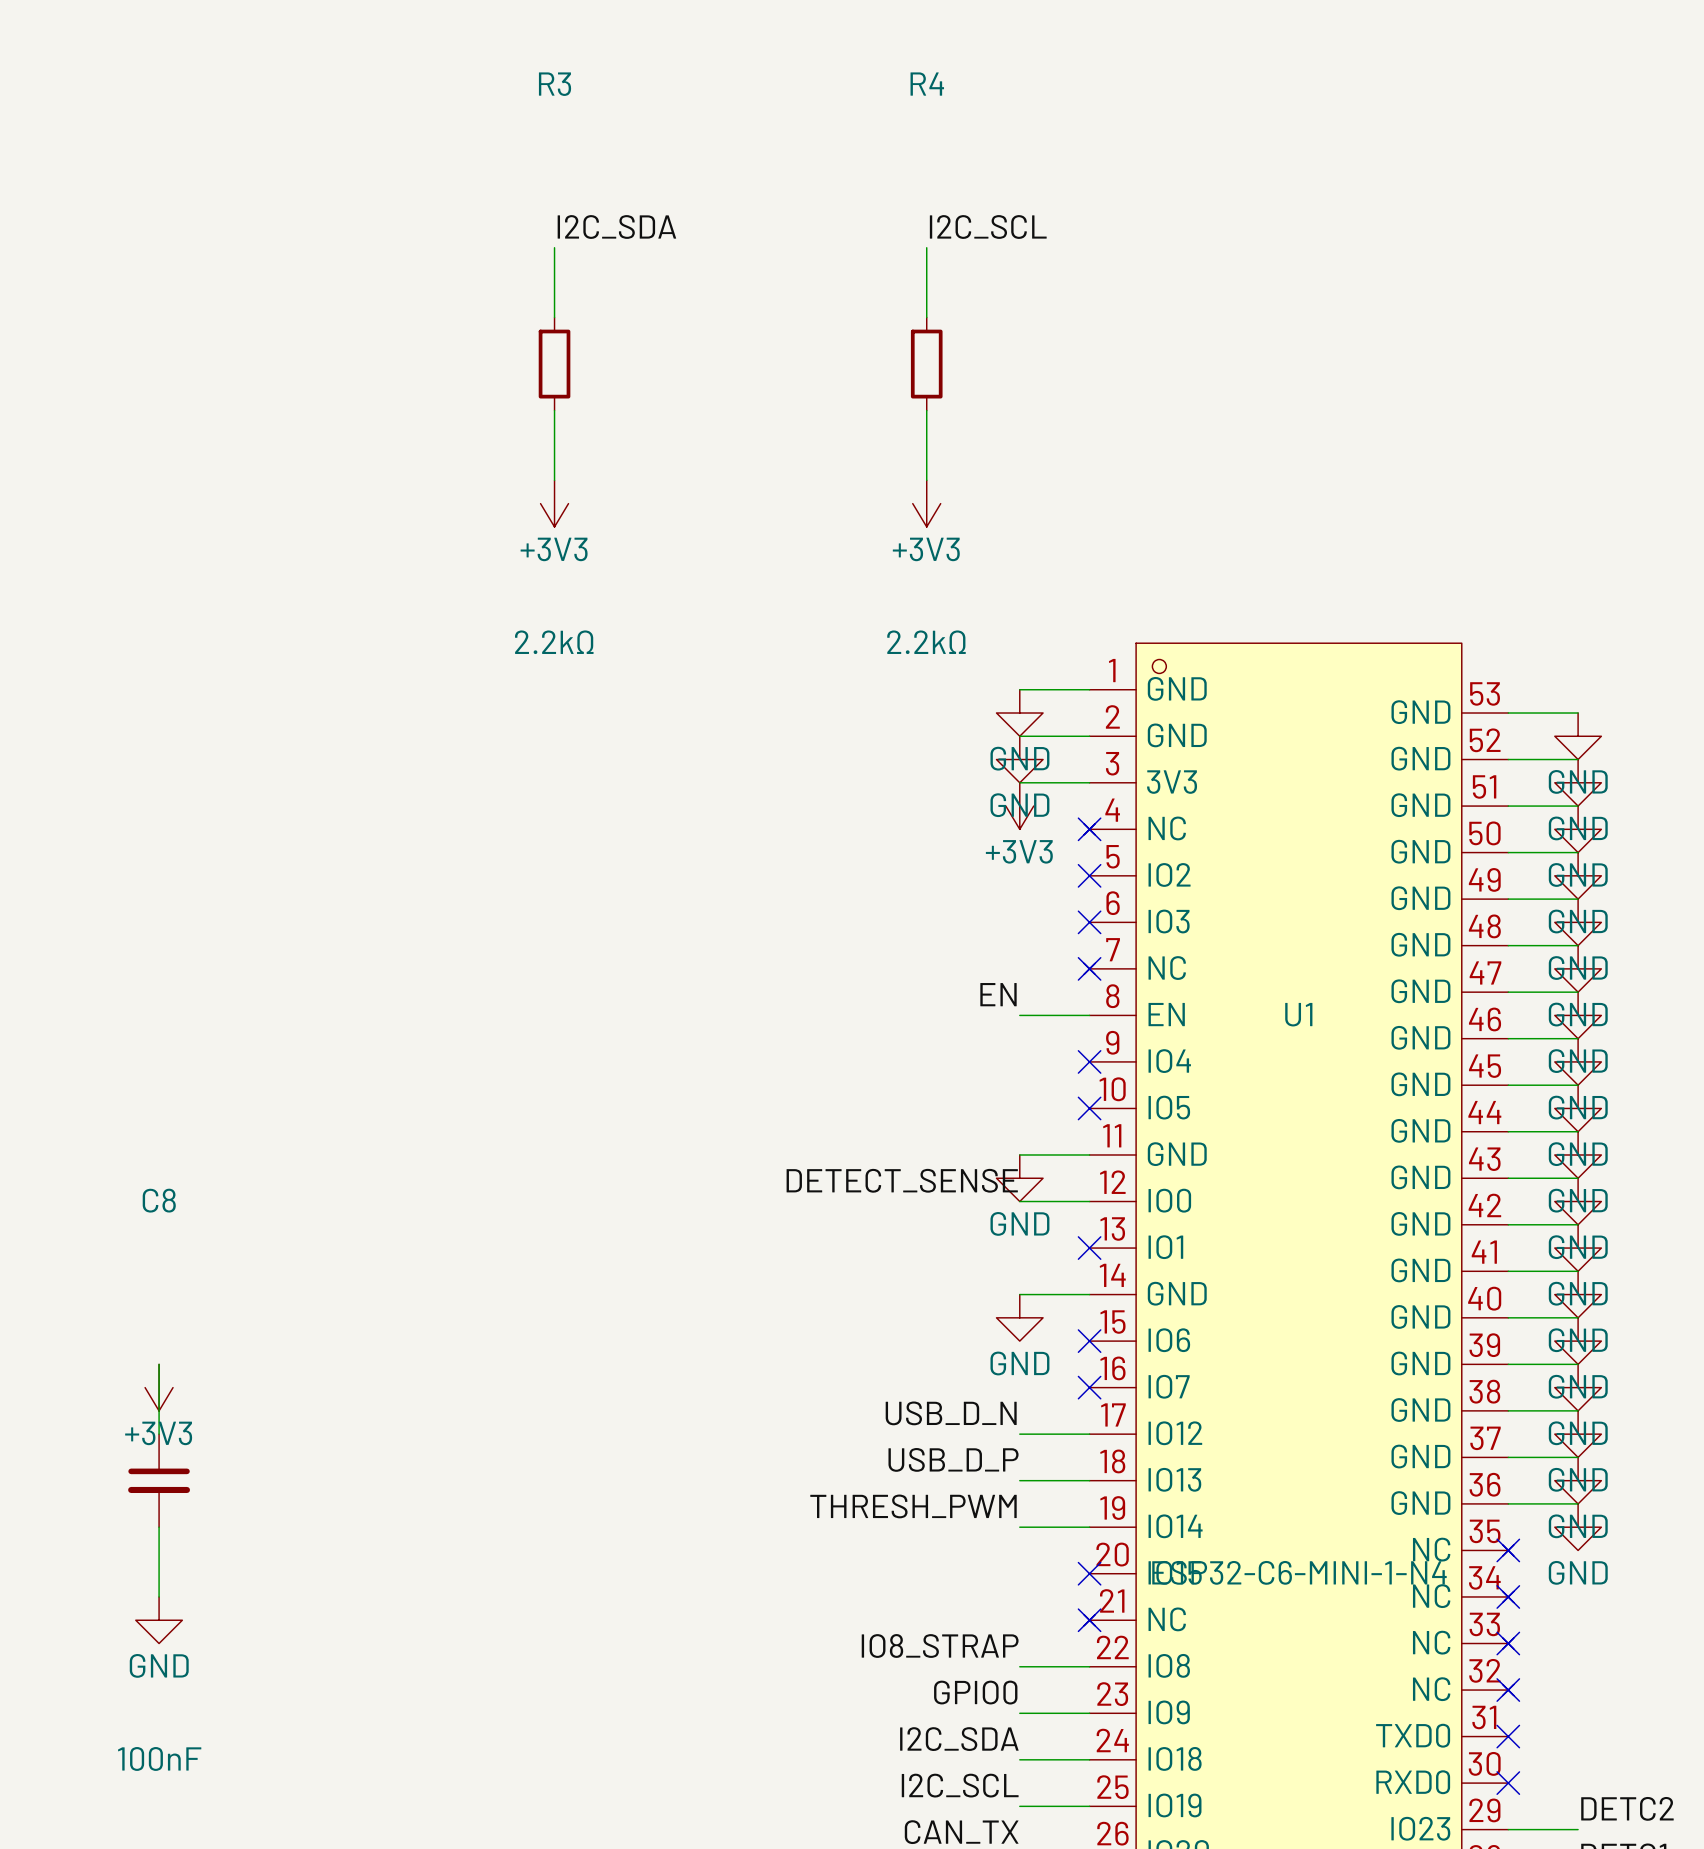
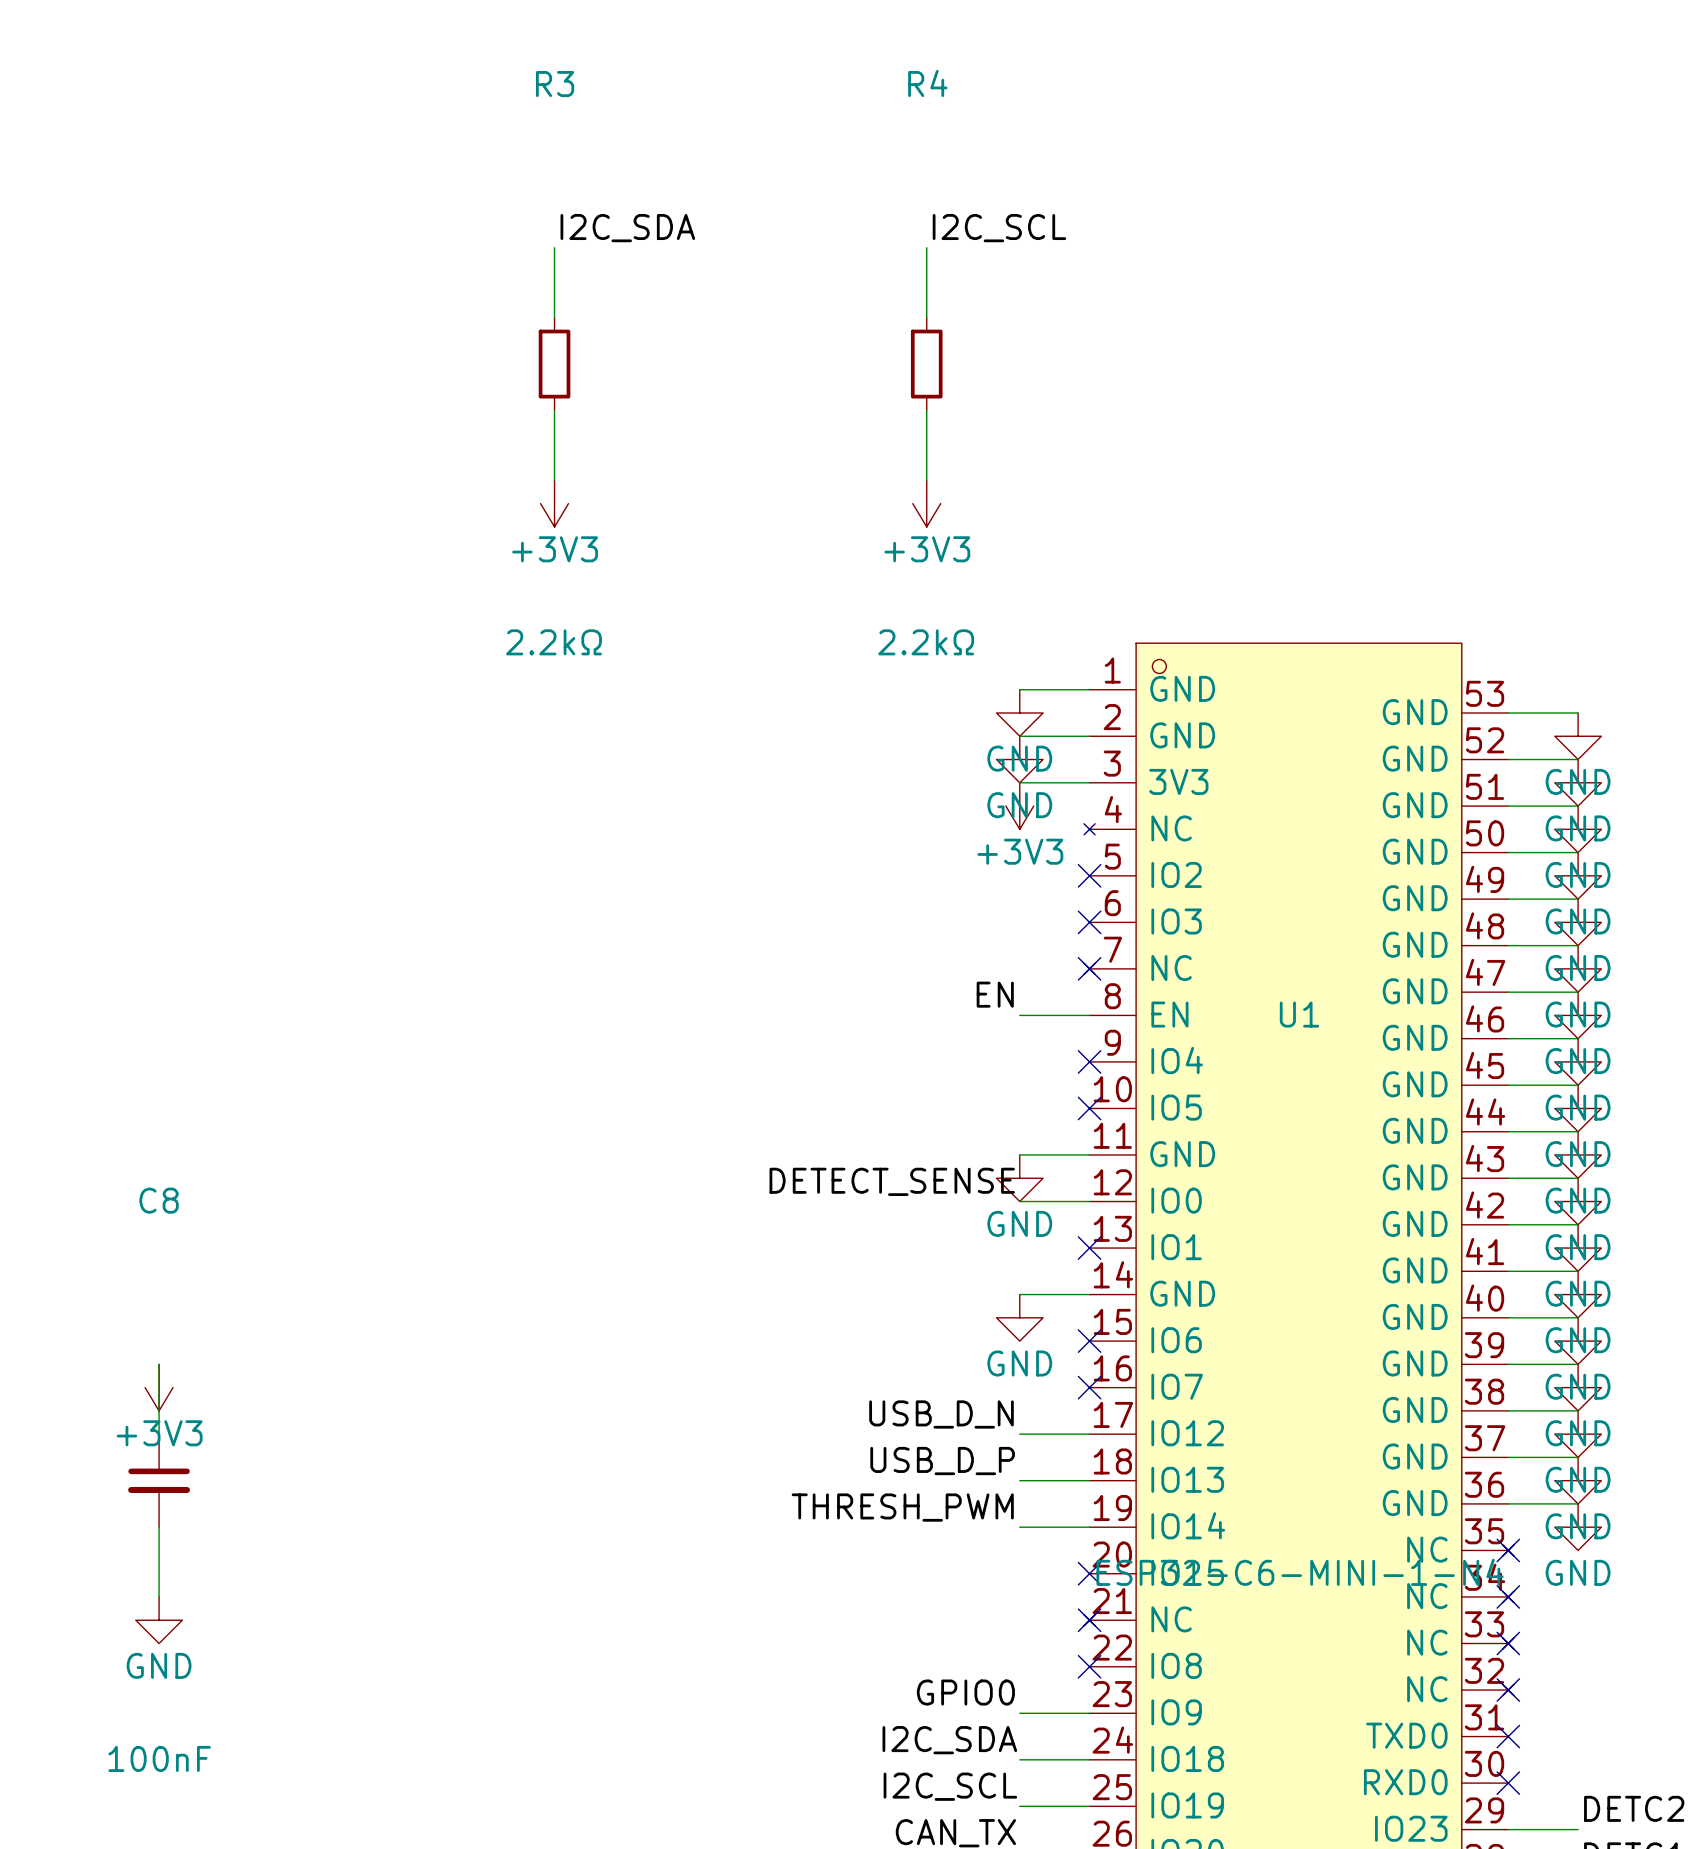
no-connect mark: (1089, 829) -> none
label: IO8_STRAP (940, 1645) -> none
wire: (1019, 1666) (1089, 1666) -> none
no-connect mark: none -> (1089, 1666)

